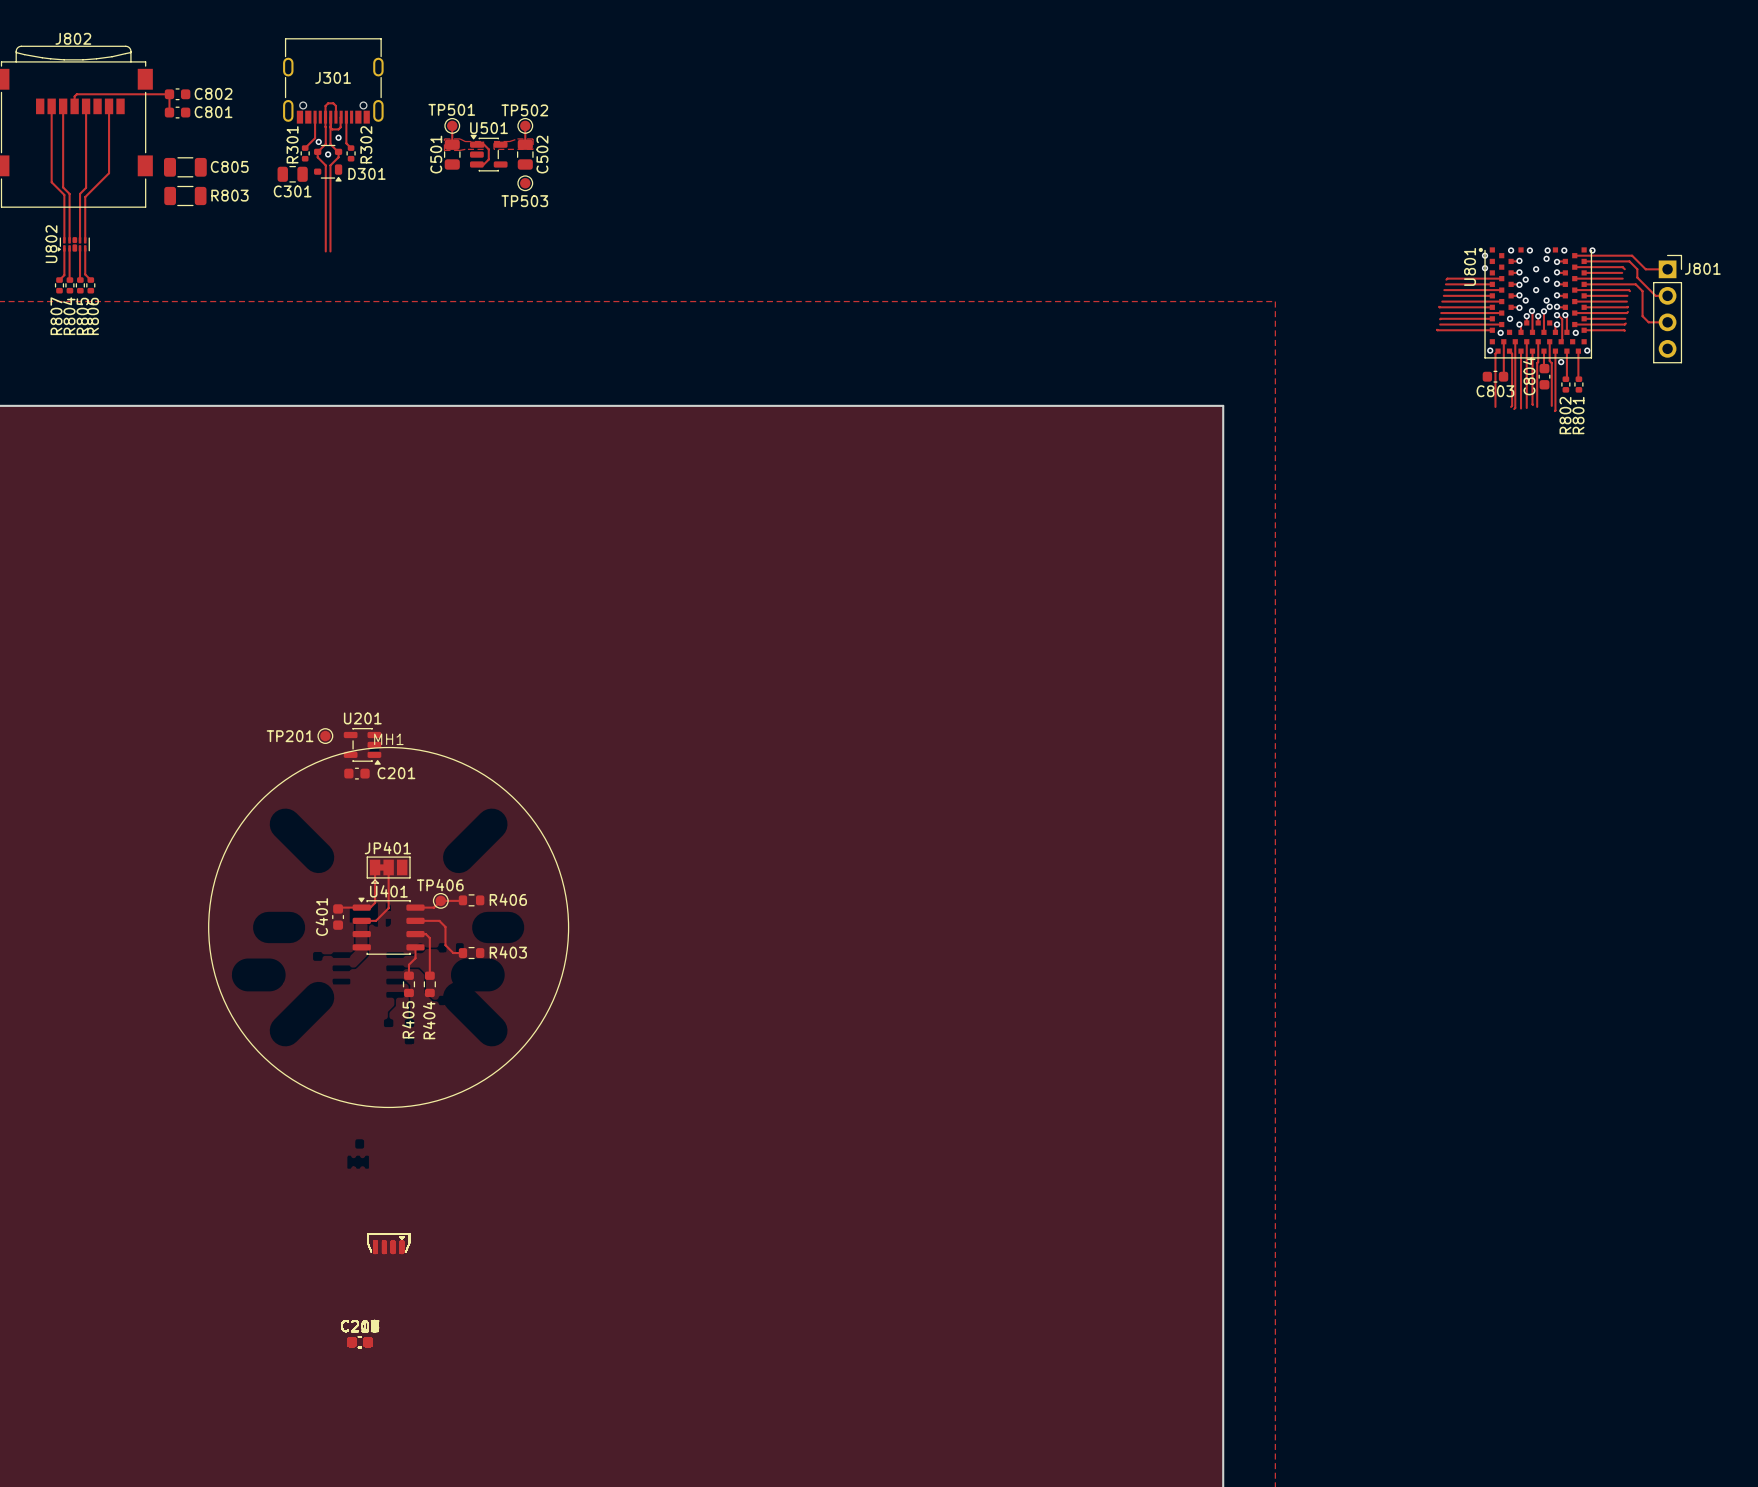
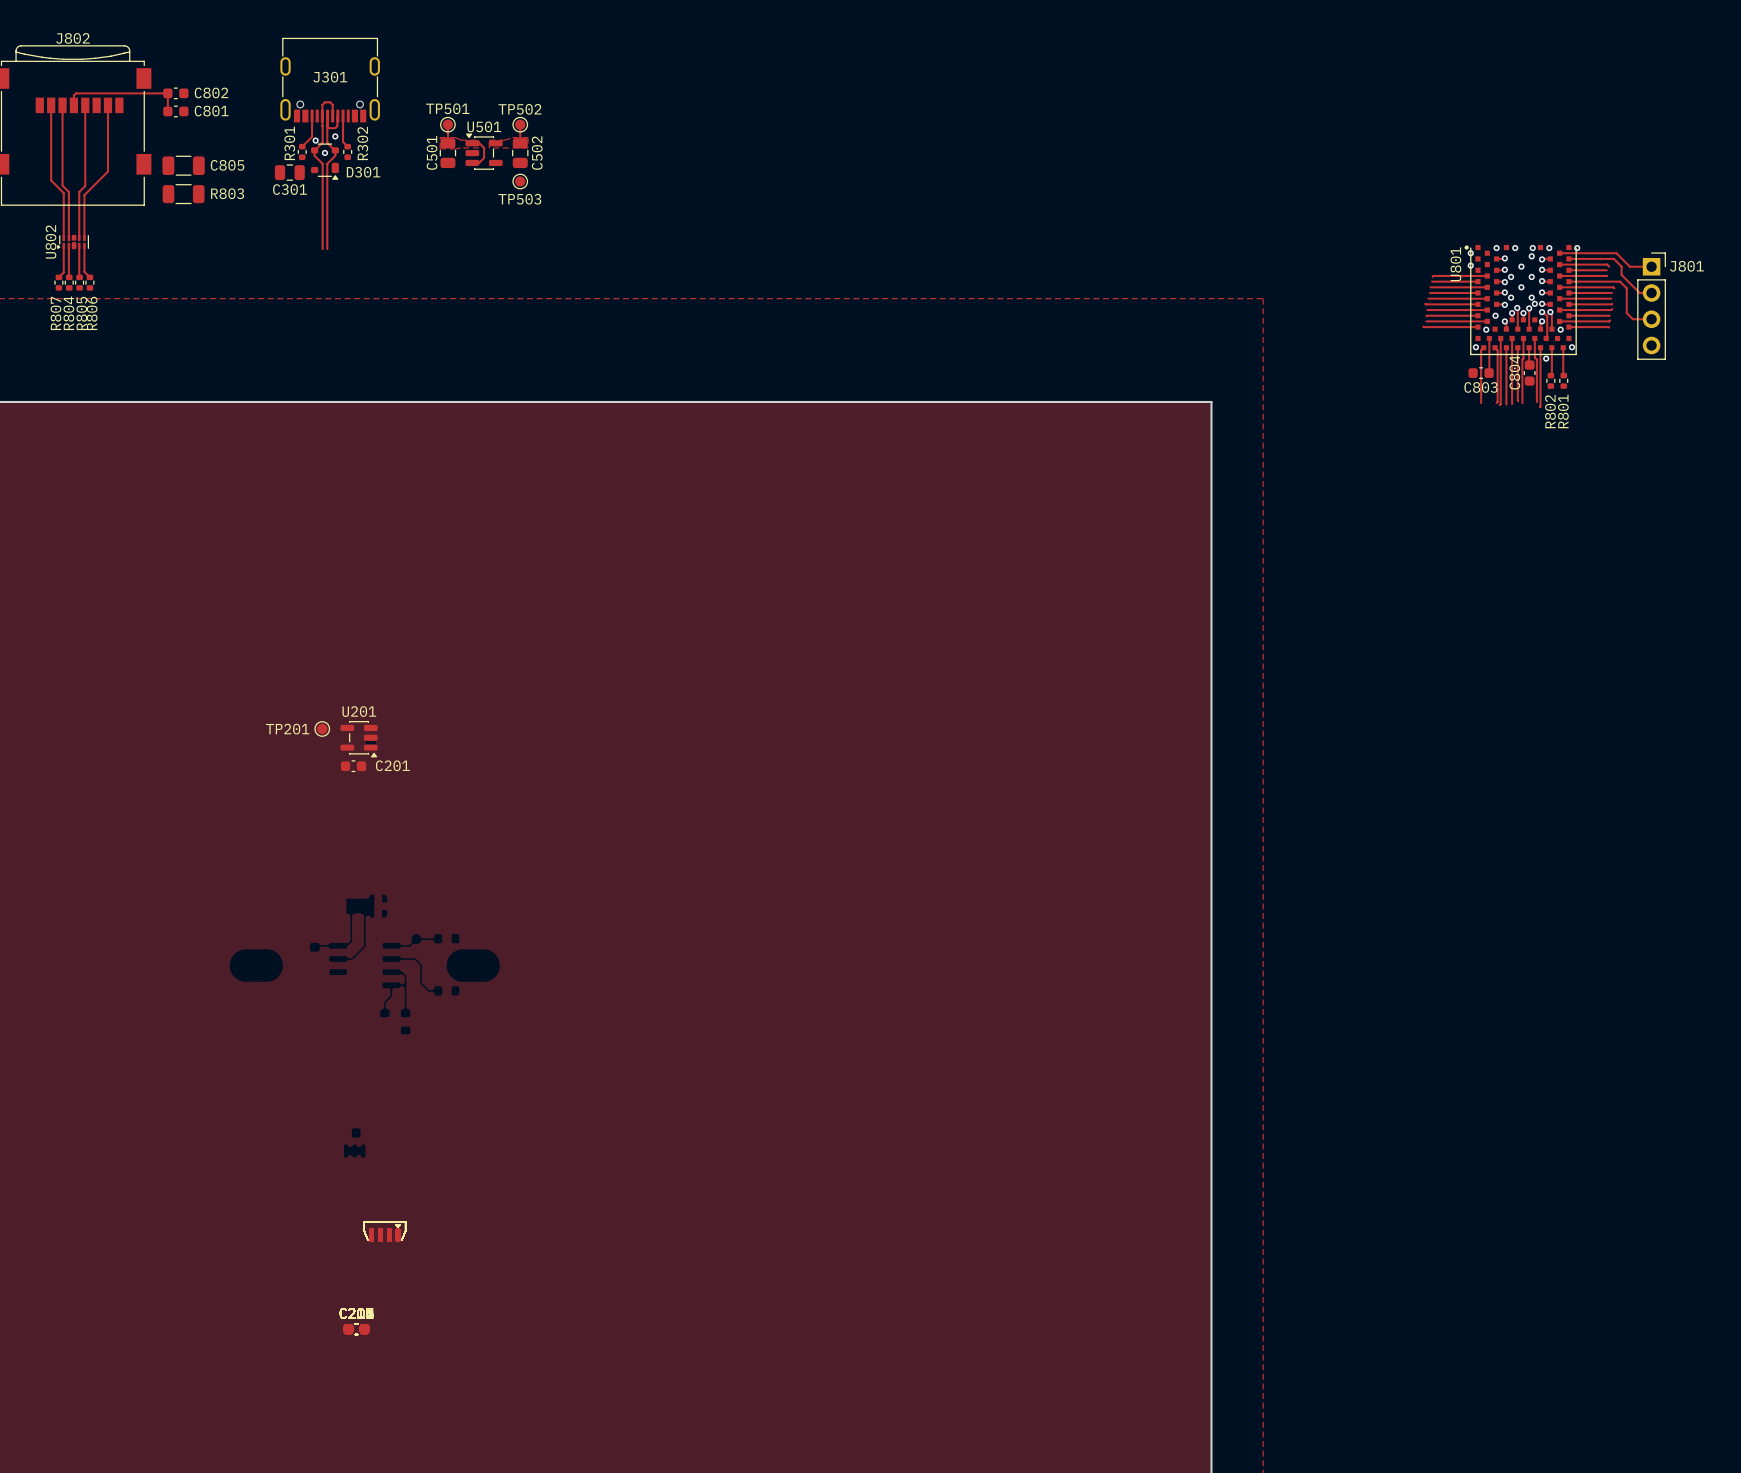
track: (375, 867) (375, 902) (370, 907) (338, 908) -> none
track: (388, 867) (388, 908) (375, 920) (361, 920) -> none
JP401: (388, 870) -> none
TP406: (440, 900) -> none
track: (463, 900) (440, 900) (434, 907) (415, 907) -> none
R406: (471, 900) -> none
C401: (338, 917) -> none
track: (415, 920) (439, 920) (445, 926) (445, 945) (453, 953) (462, 953) -> none
U401: (388, 926) -> none
MH1: (388, 927) -> none
track: (415, 934) (425, 934) (429, 938) (429, 975) -> none
track: (415, 947) (415, 958) (408, 964) (408, 975) -> none
R403: (471, 953) -> none
R405: (408, 984) -> none
R404: (429, 984) -> none

